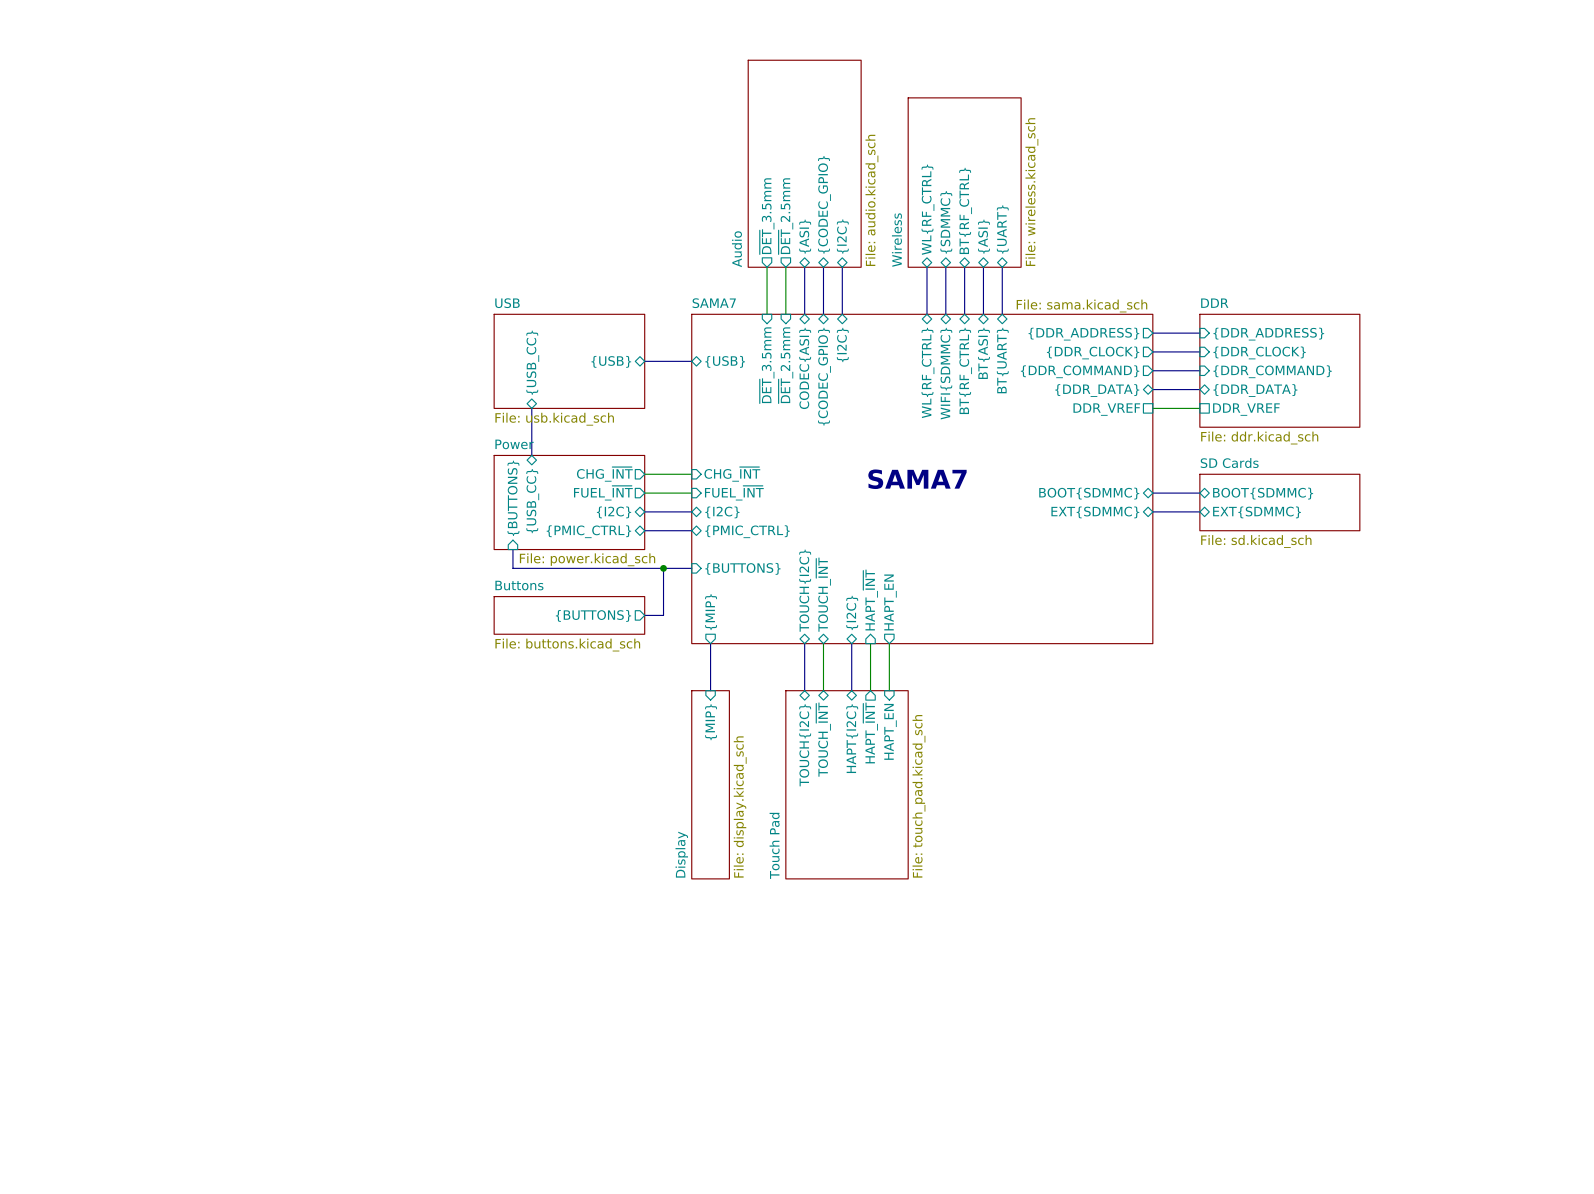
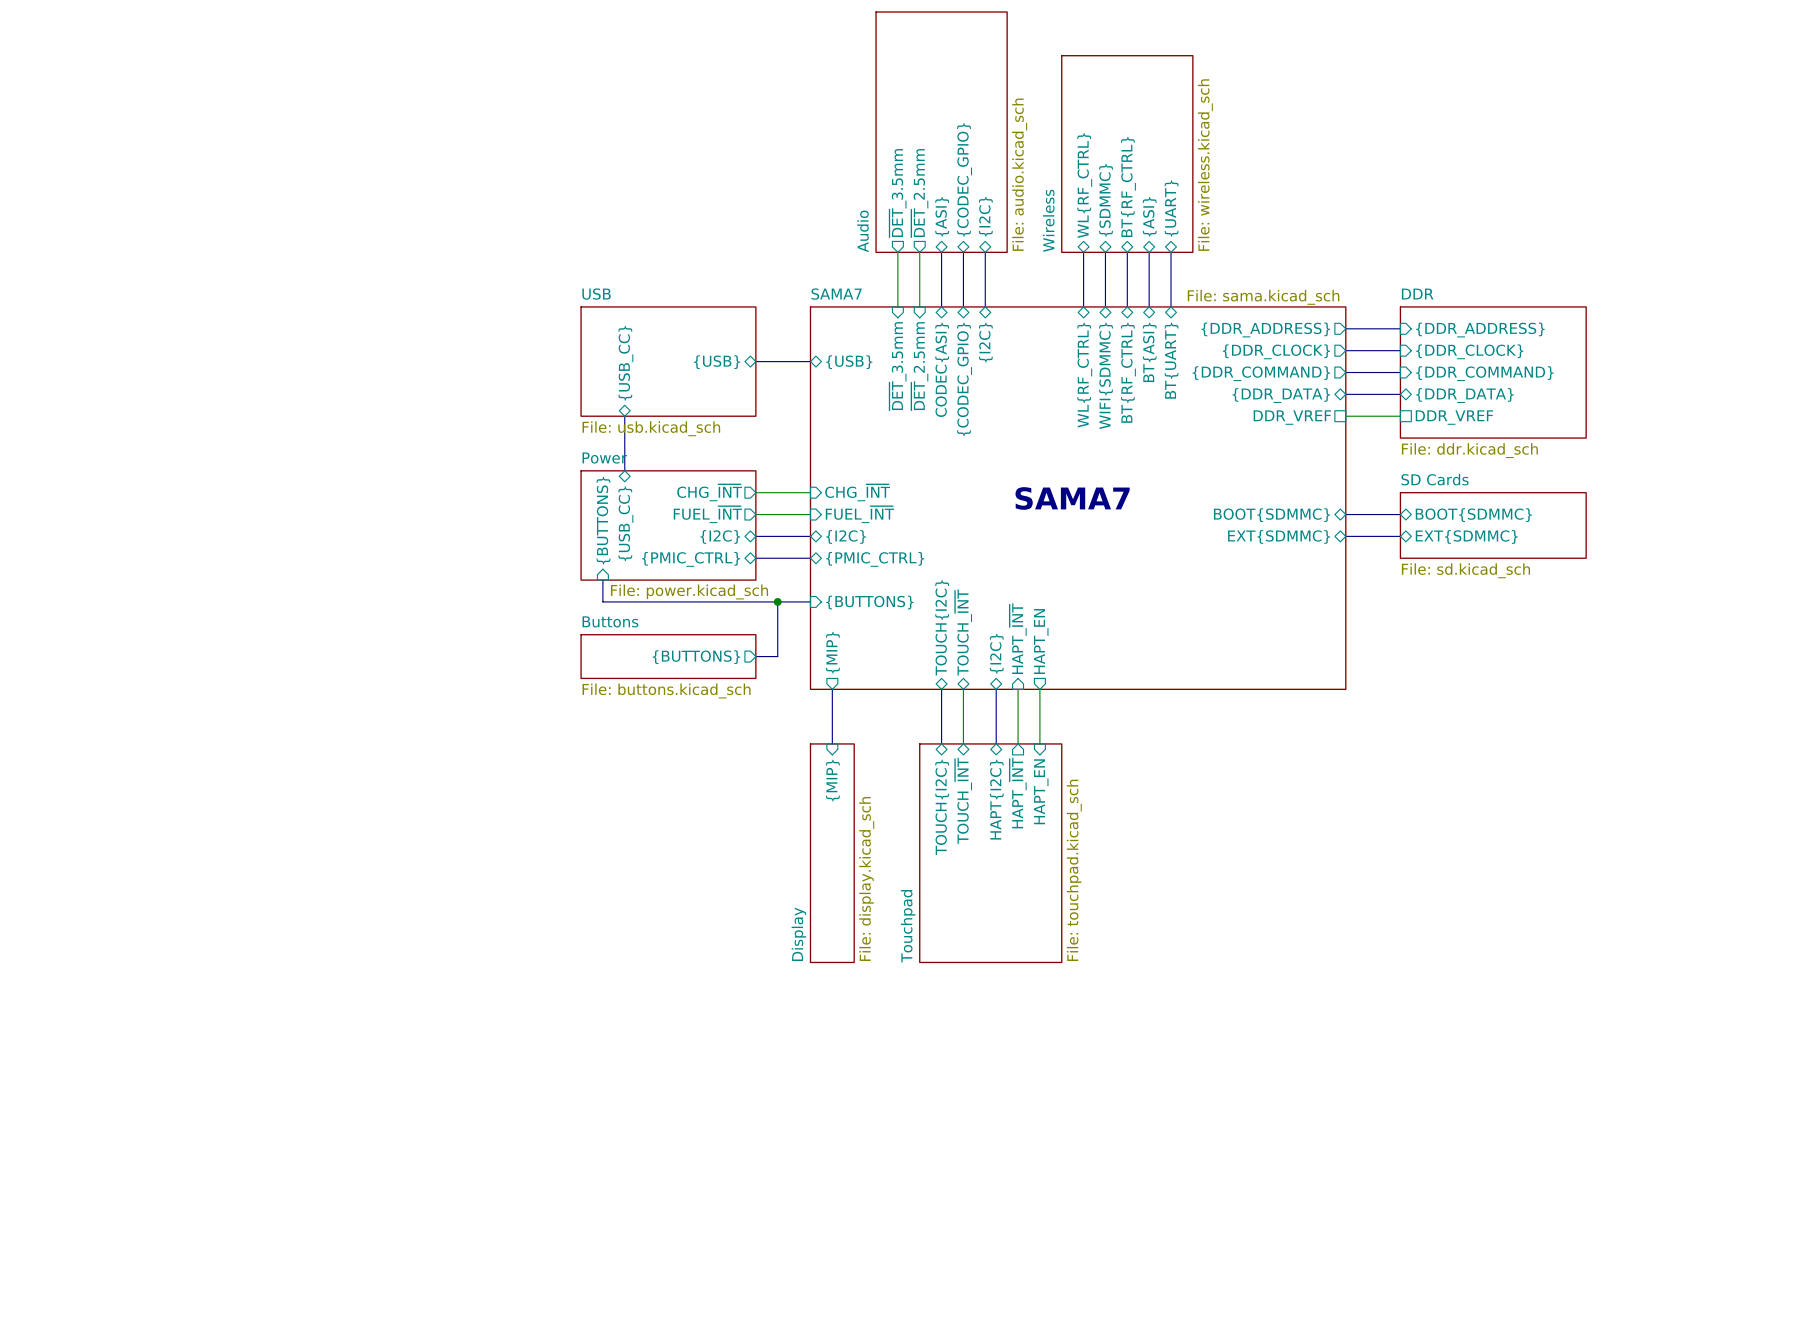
sheet Touch Pad value: File: touch_pad.kicad_sch (918, 796) -> File: touchpad.kicad_sch (1074, 870)
sheet Touch Pad name: Touch Pad (774, 845) -> Touchpad (908, 926)

